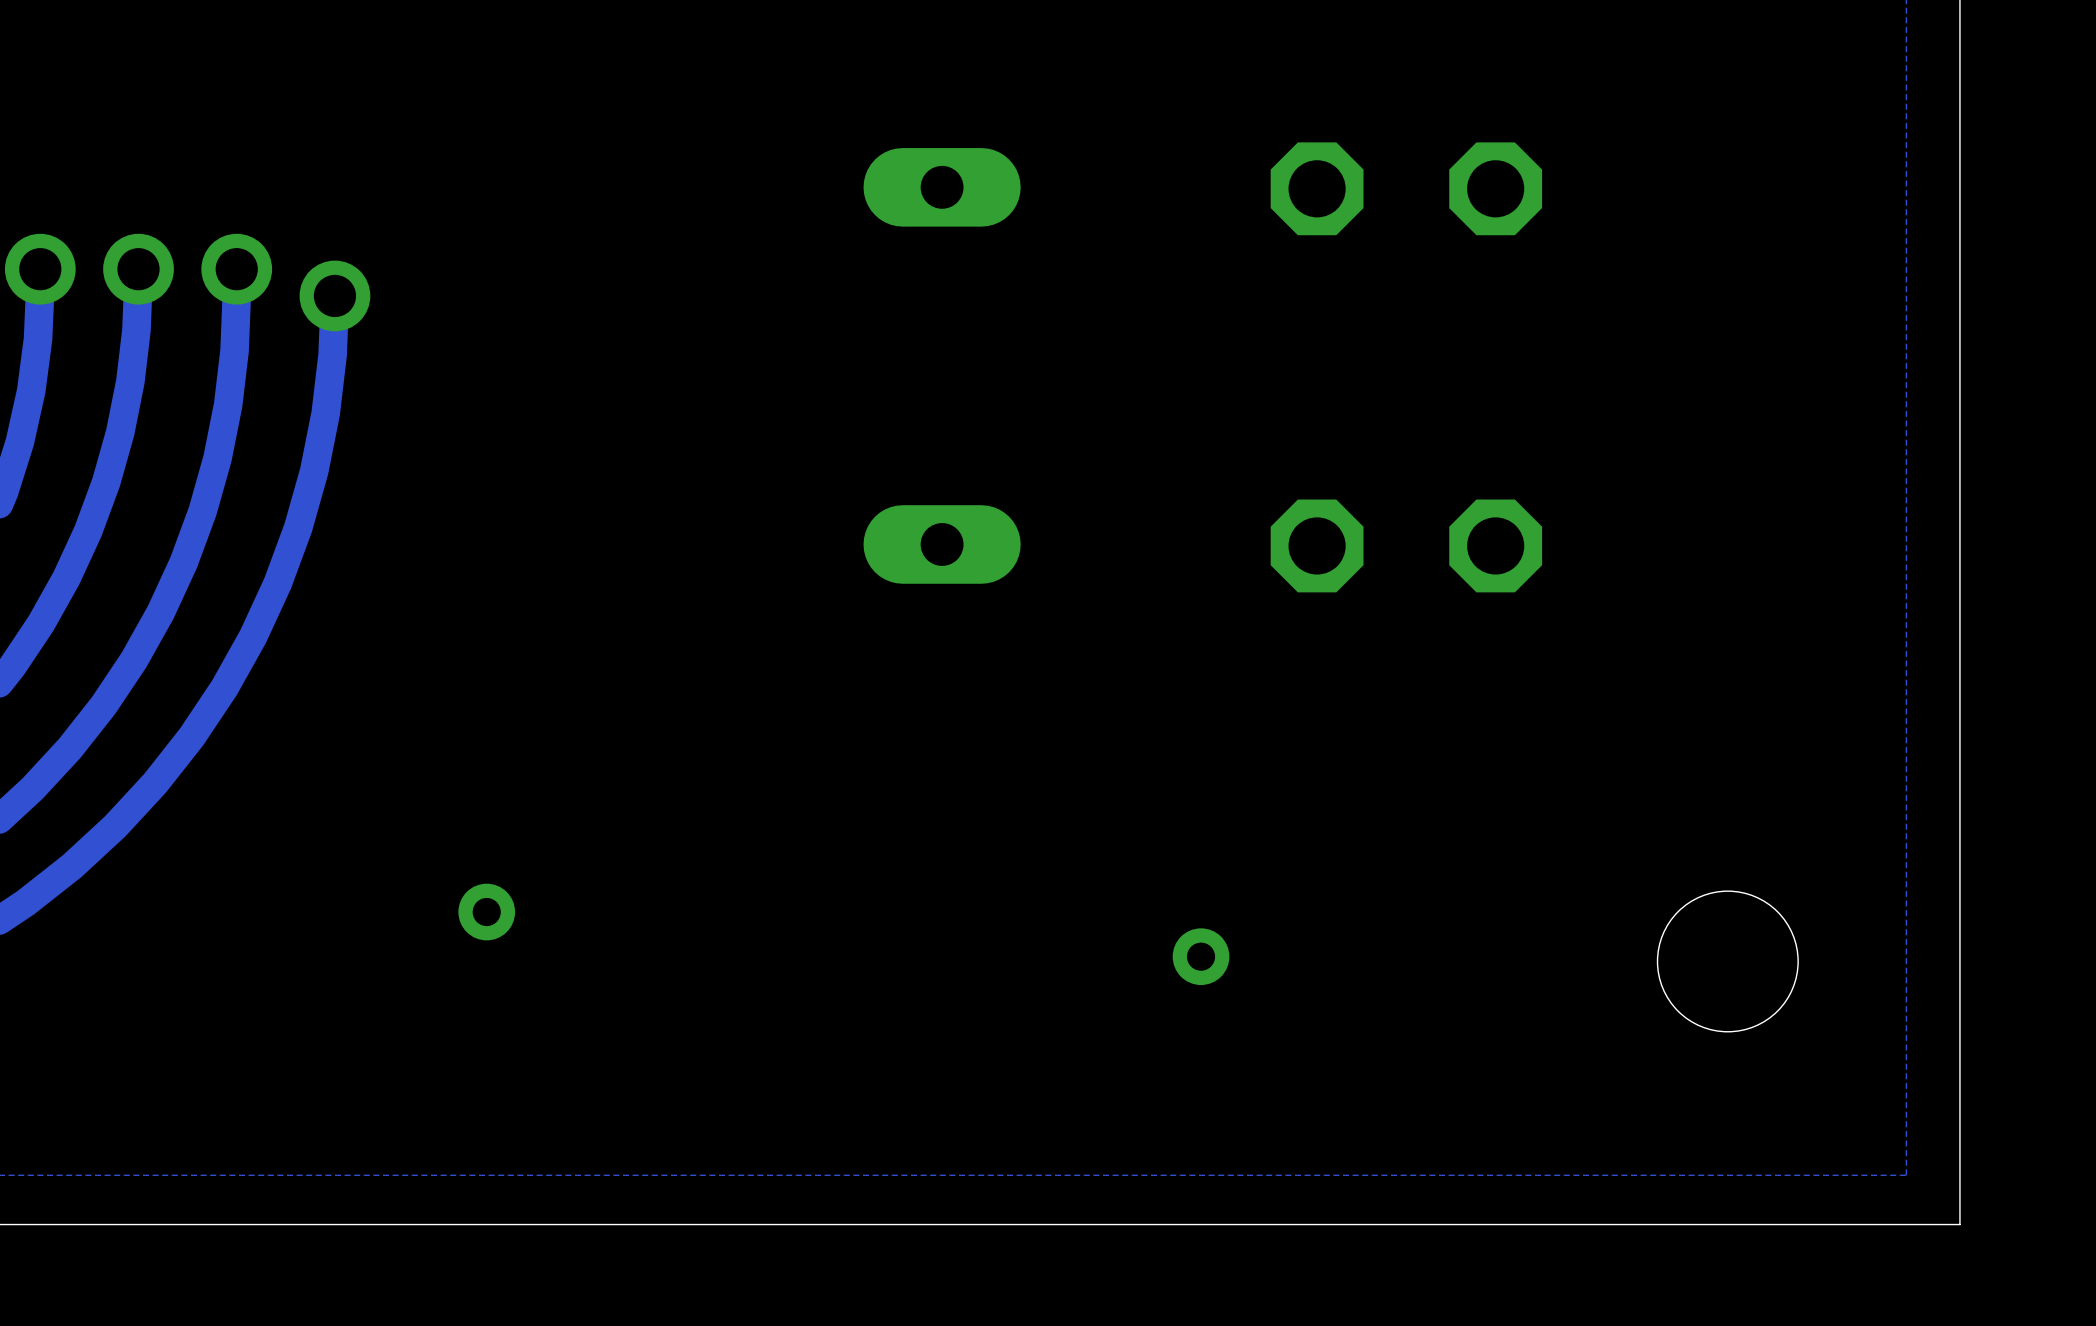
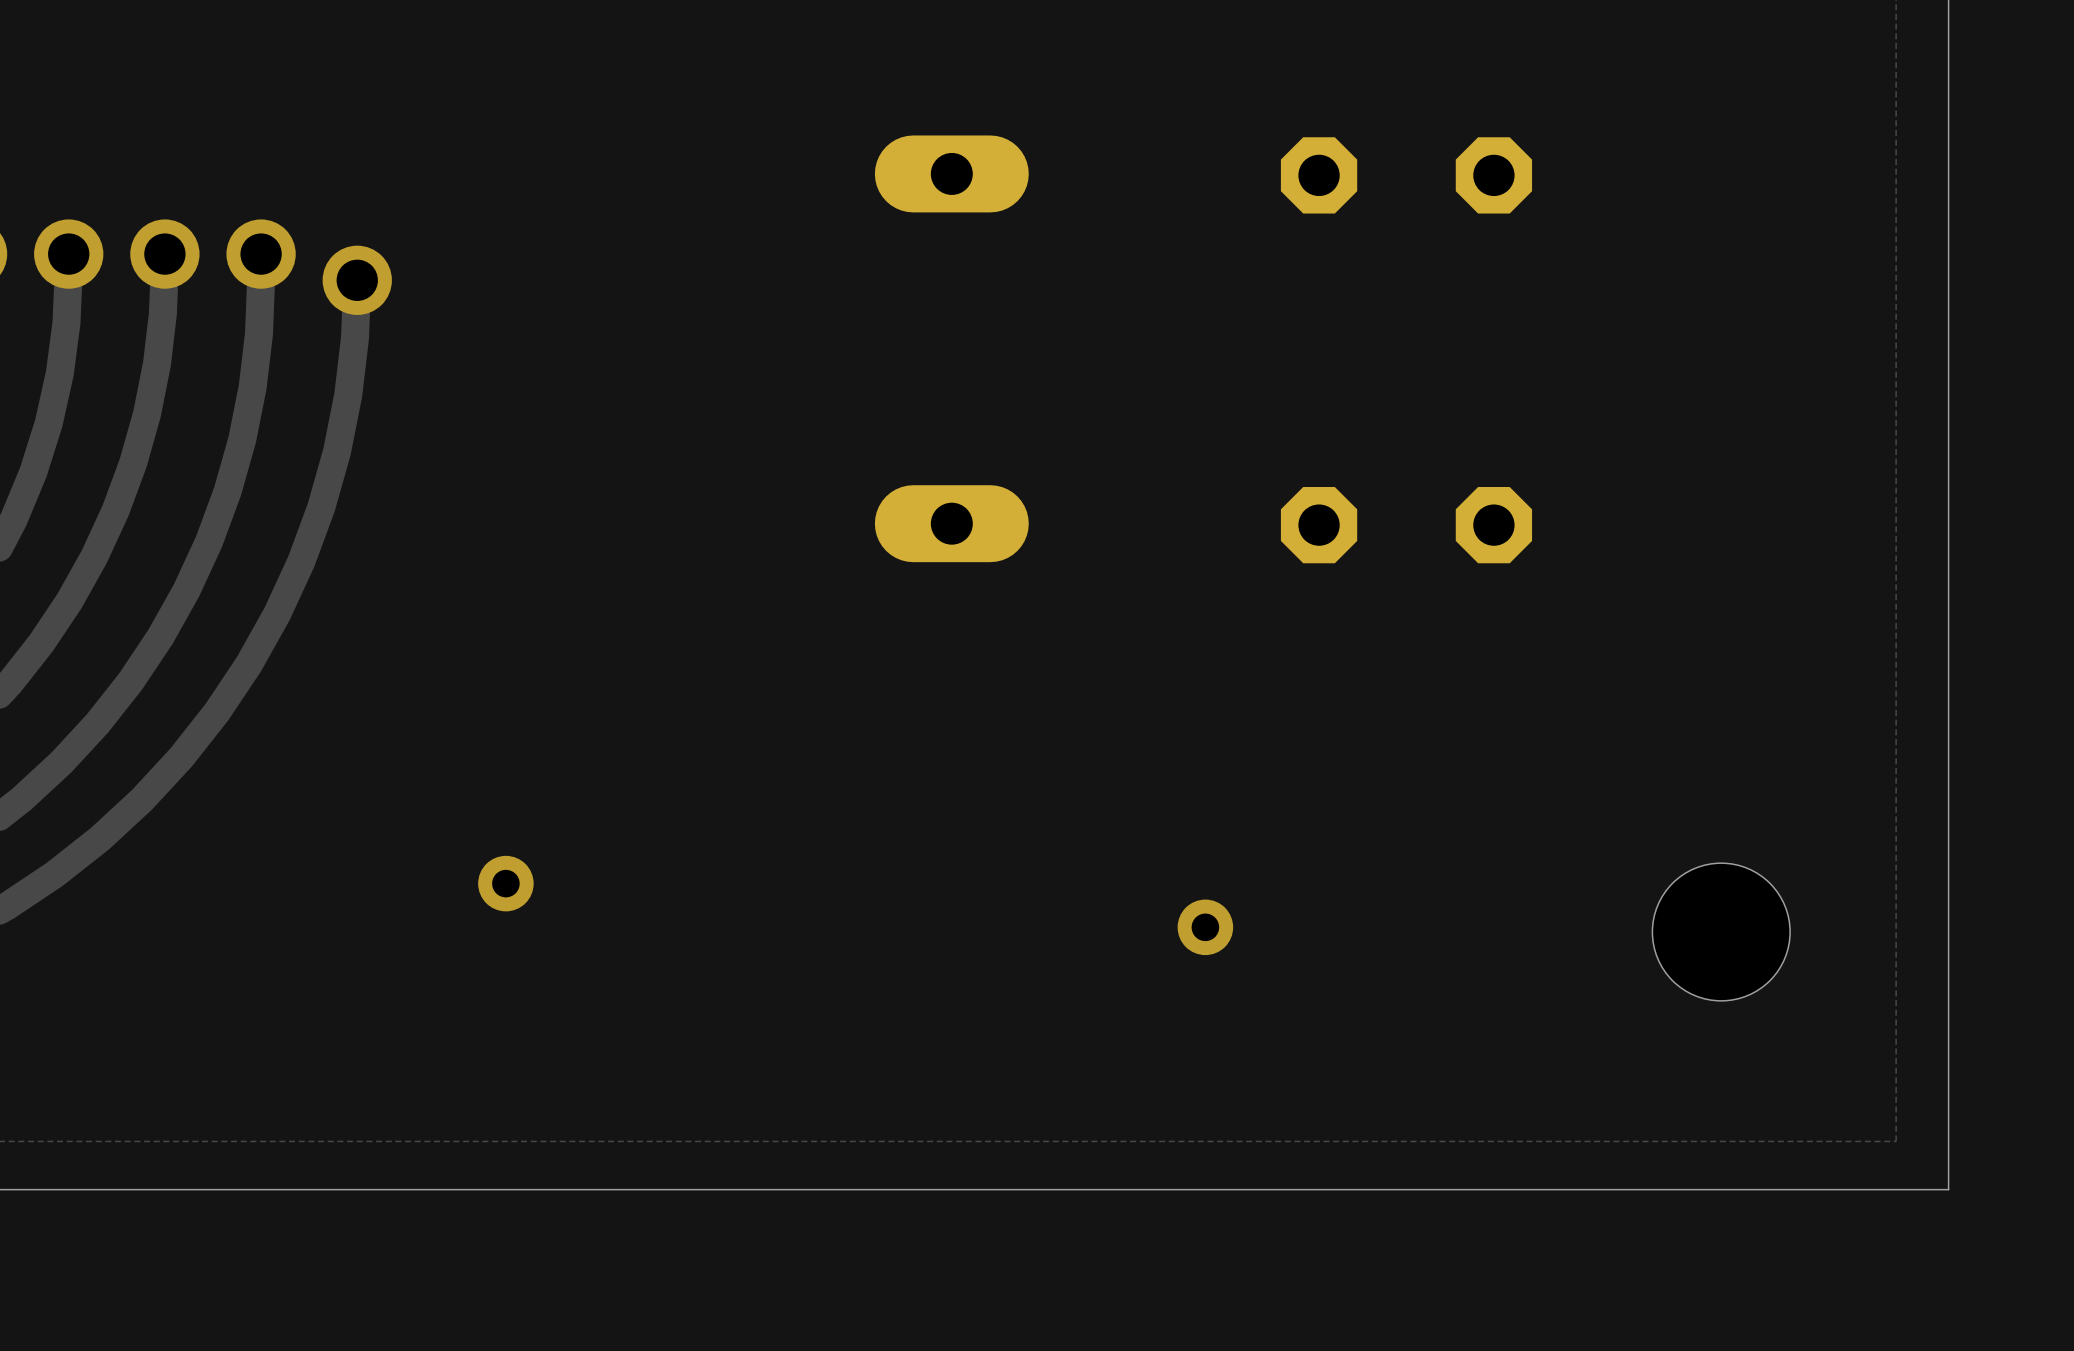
part footprint: [1270, 142, 1543, 236] -> [1280, 137, 1533, 214]
part footprint: [1270, 499, 1543, 593] -> [1280, 486, 1533, 564]

